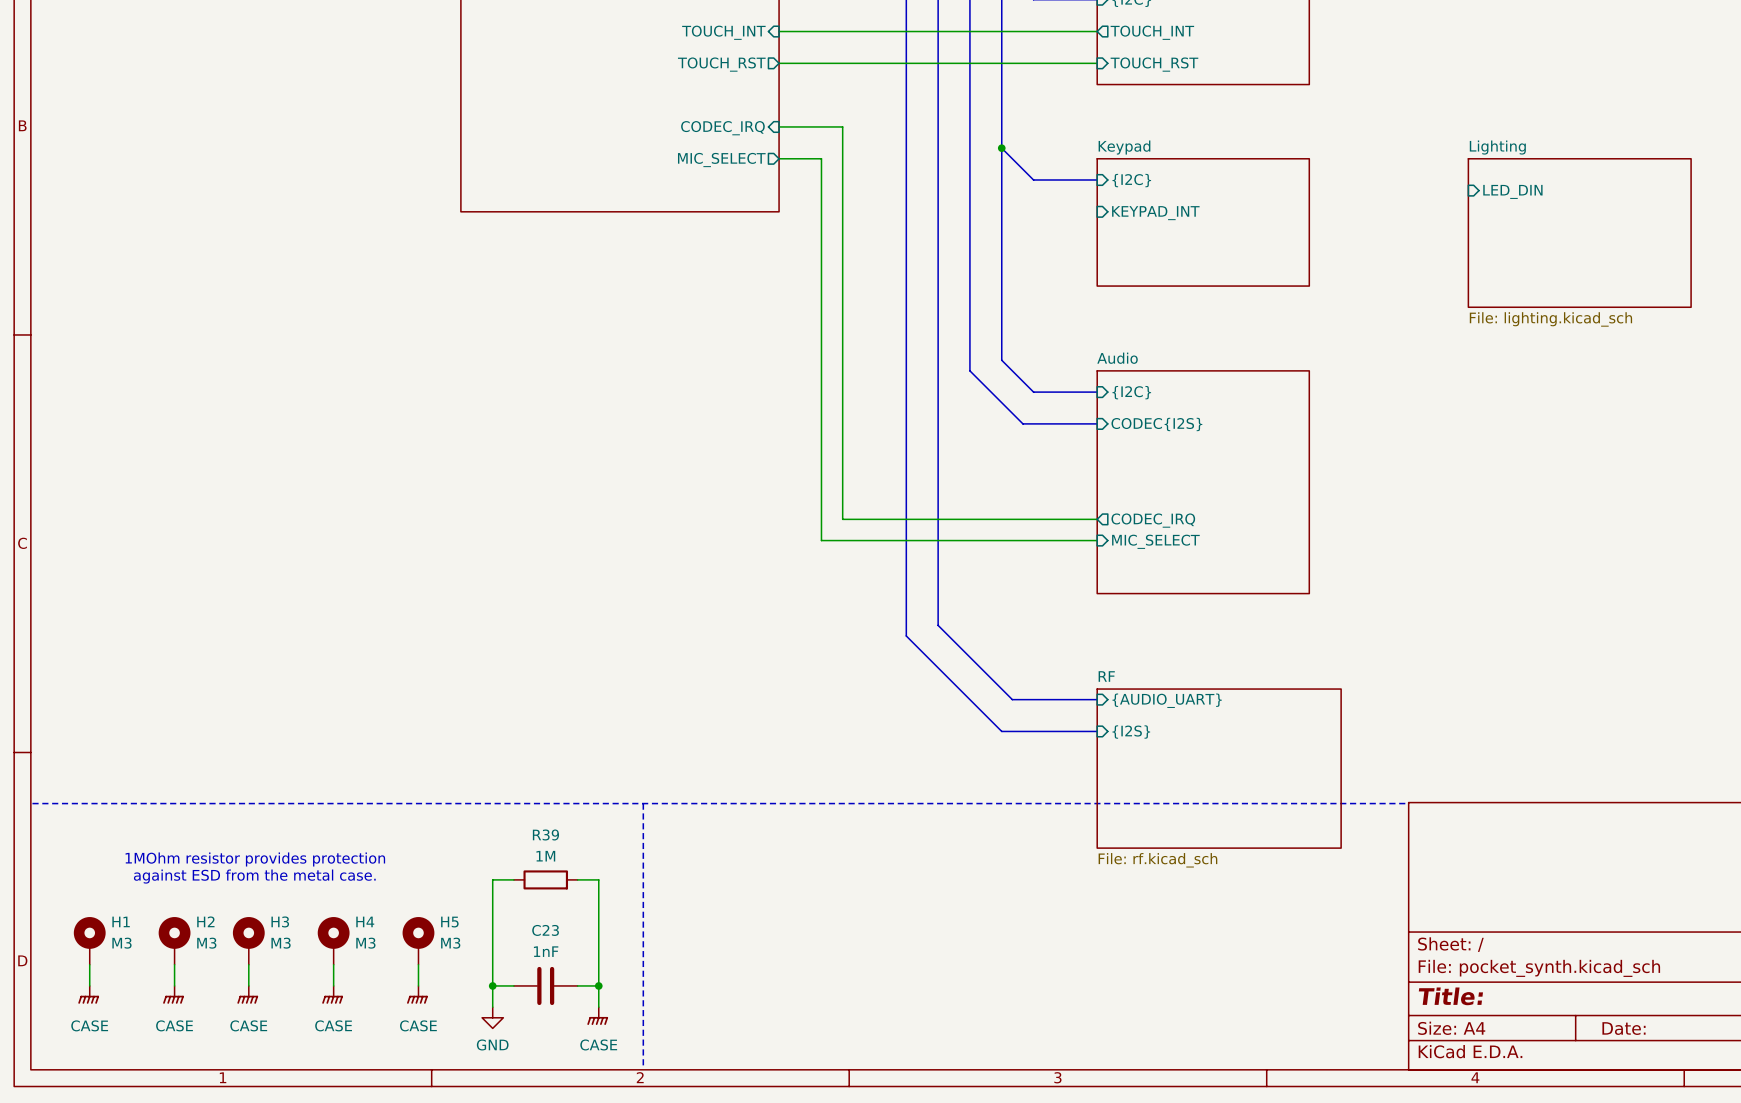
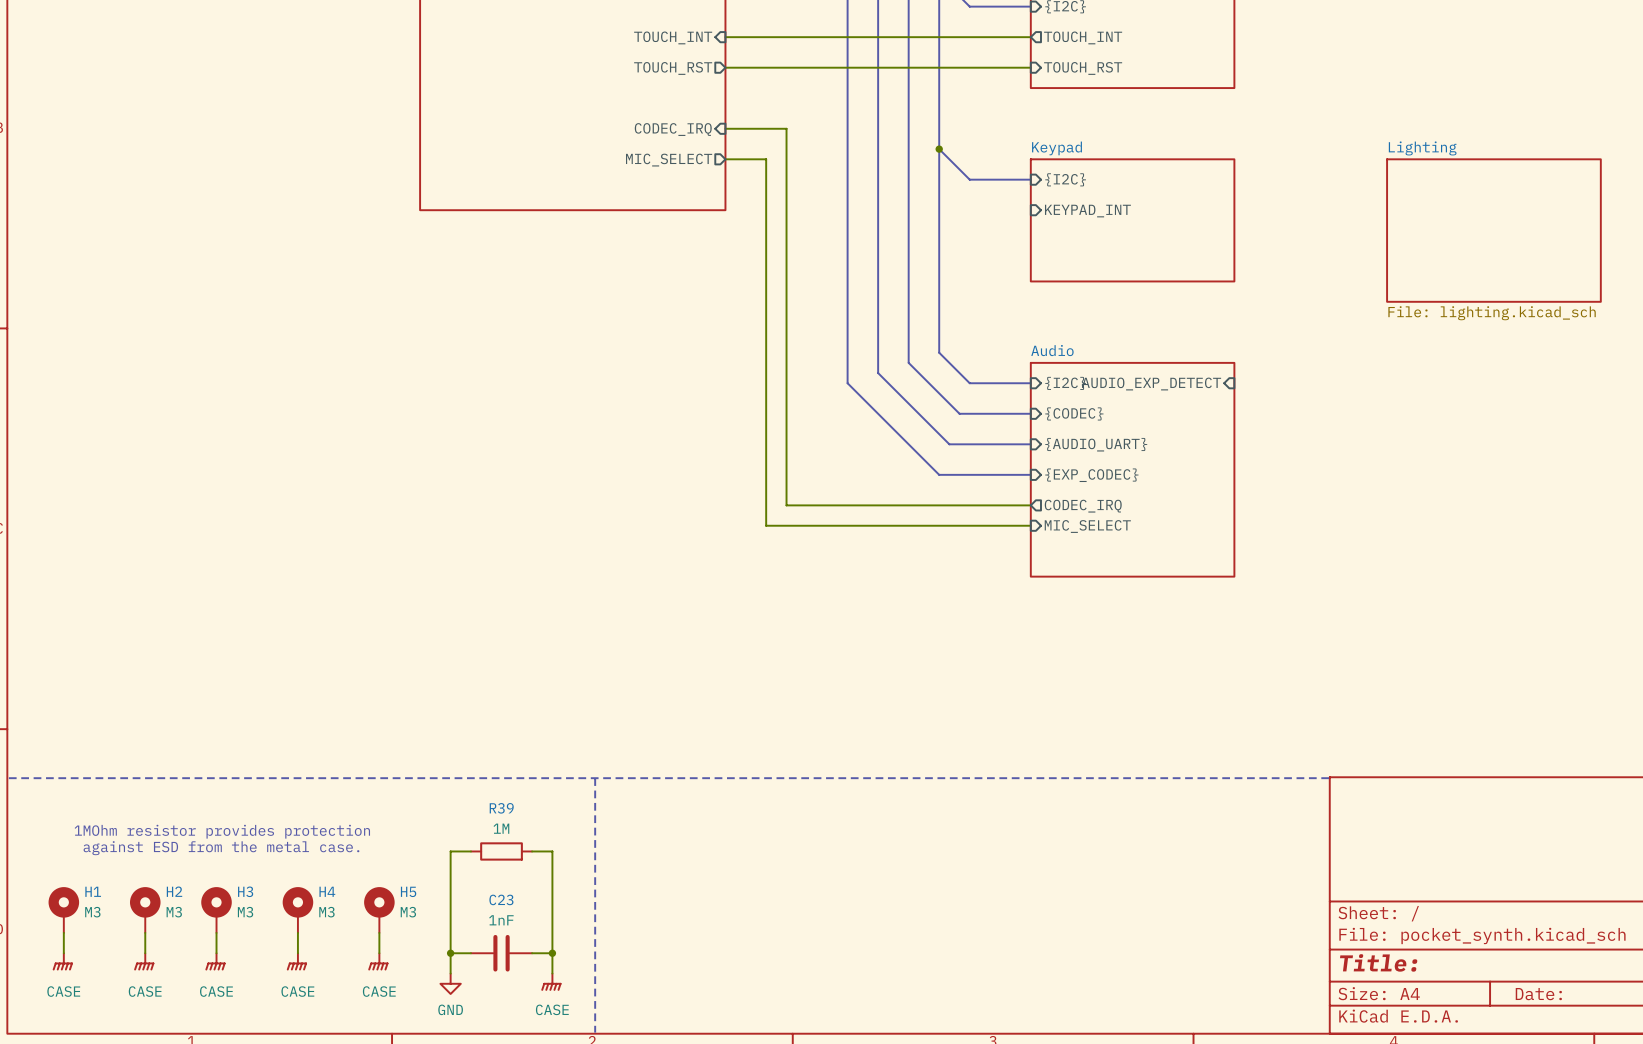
sheet pin: LED_DIN (1512, 191) -> none
bus: (938, 381) (938, 625) (1012, 699) (1097, 699) -> (878, 373) (949, 444) (1030, 444)
bus: (906, 392) (906, 636) (1001, 731) (1097, 731) -> (847, 383) (939, 474) (1030, 474)
sheet pin: none -> AUDIO_EXP_DETECT (1151, 384)
sheet pin: CODEC{I2S} (1156, 424) -> {CODEC} (1074, 413)
sheet pin: none -> {AUDIO_UART} (1096, 444)
sheet pin: none -> {EXP_CODEC} (1091, 475)
sheet pin: {AUDIO_UART} (1167, 700) -> none
sheet pin: {I2S} (1131, 732) -> none
sheet RF: File: rf.kicad_sch (1219, 768) -> none

